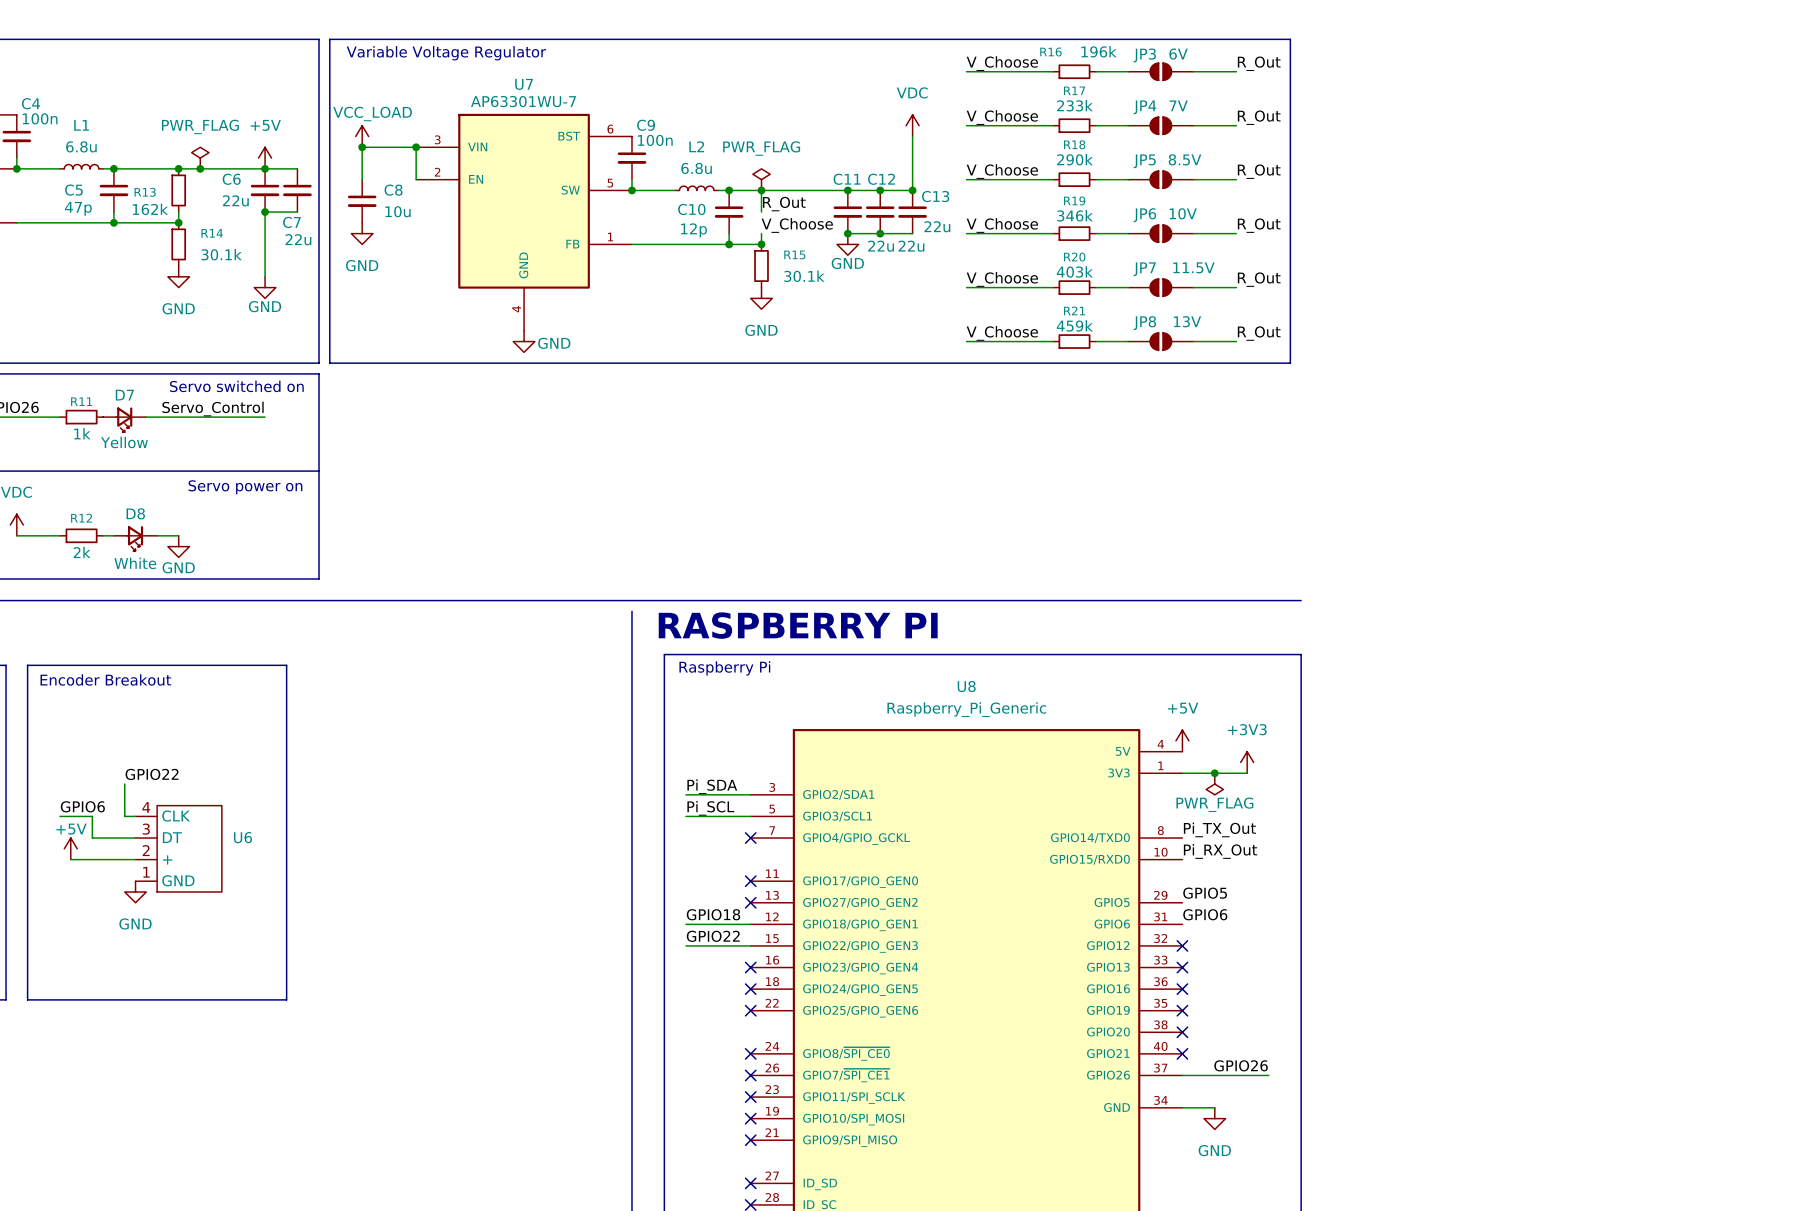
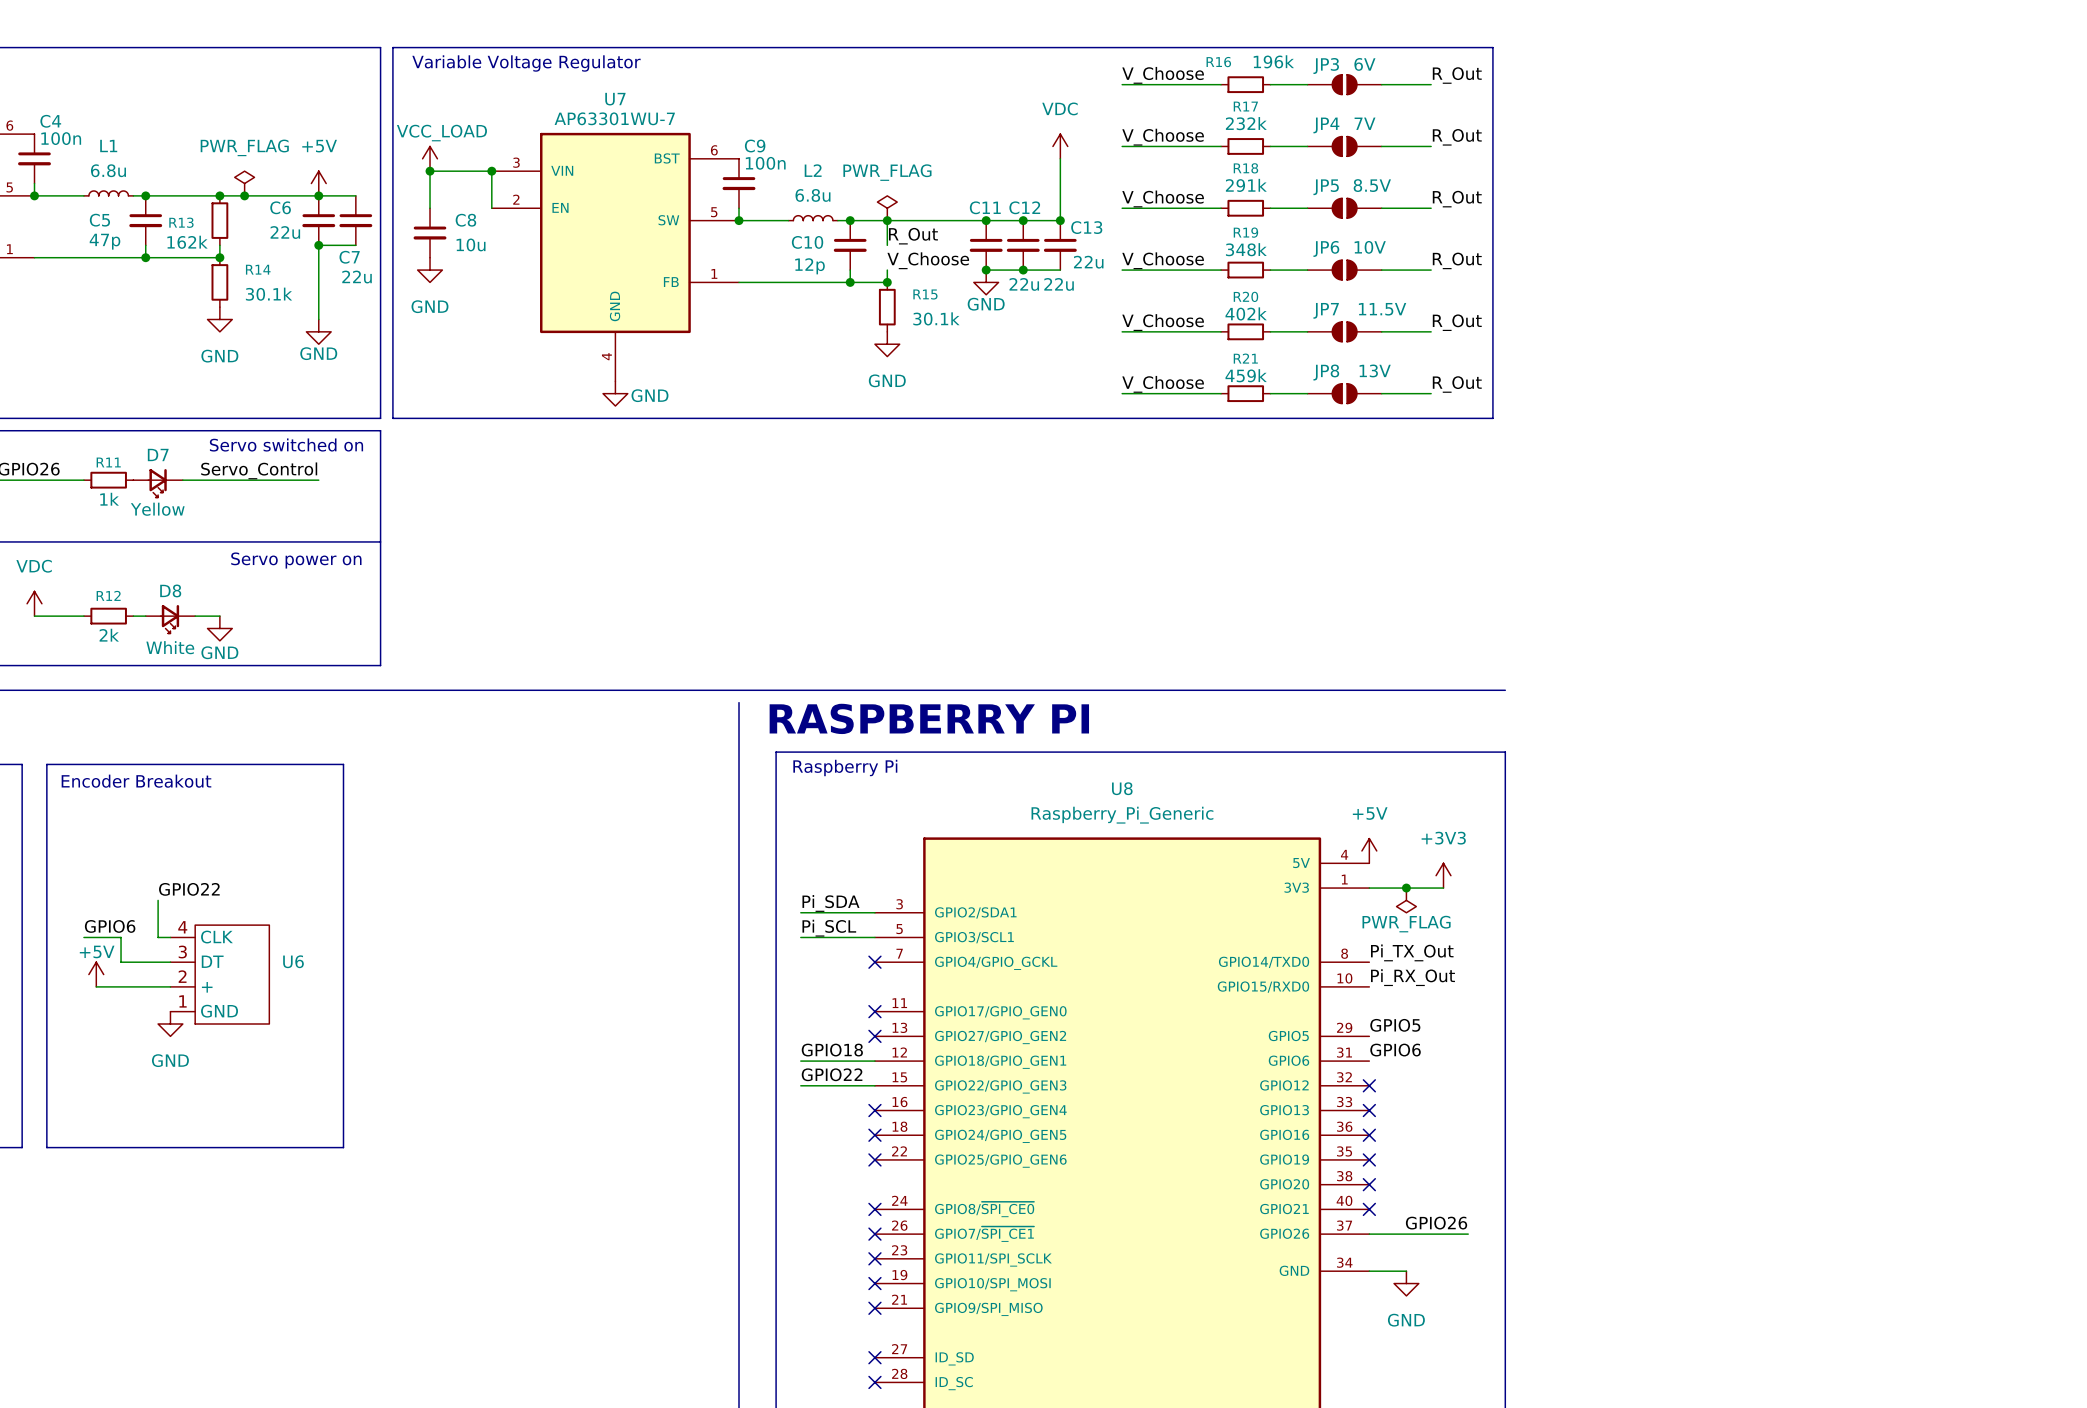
R17 value: 233k (1075, 105) -> 232k (1246, 123)
R18 value: 290k (1075, 159) -> 291k (1246, 185)
R19 value: 346k (1075, 215) -> 348k (1246, 249)
R20 value: 403k (1074, 271) -> 402k (1246, 313)

